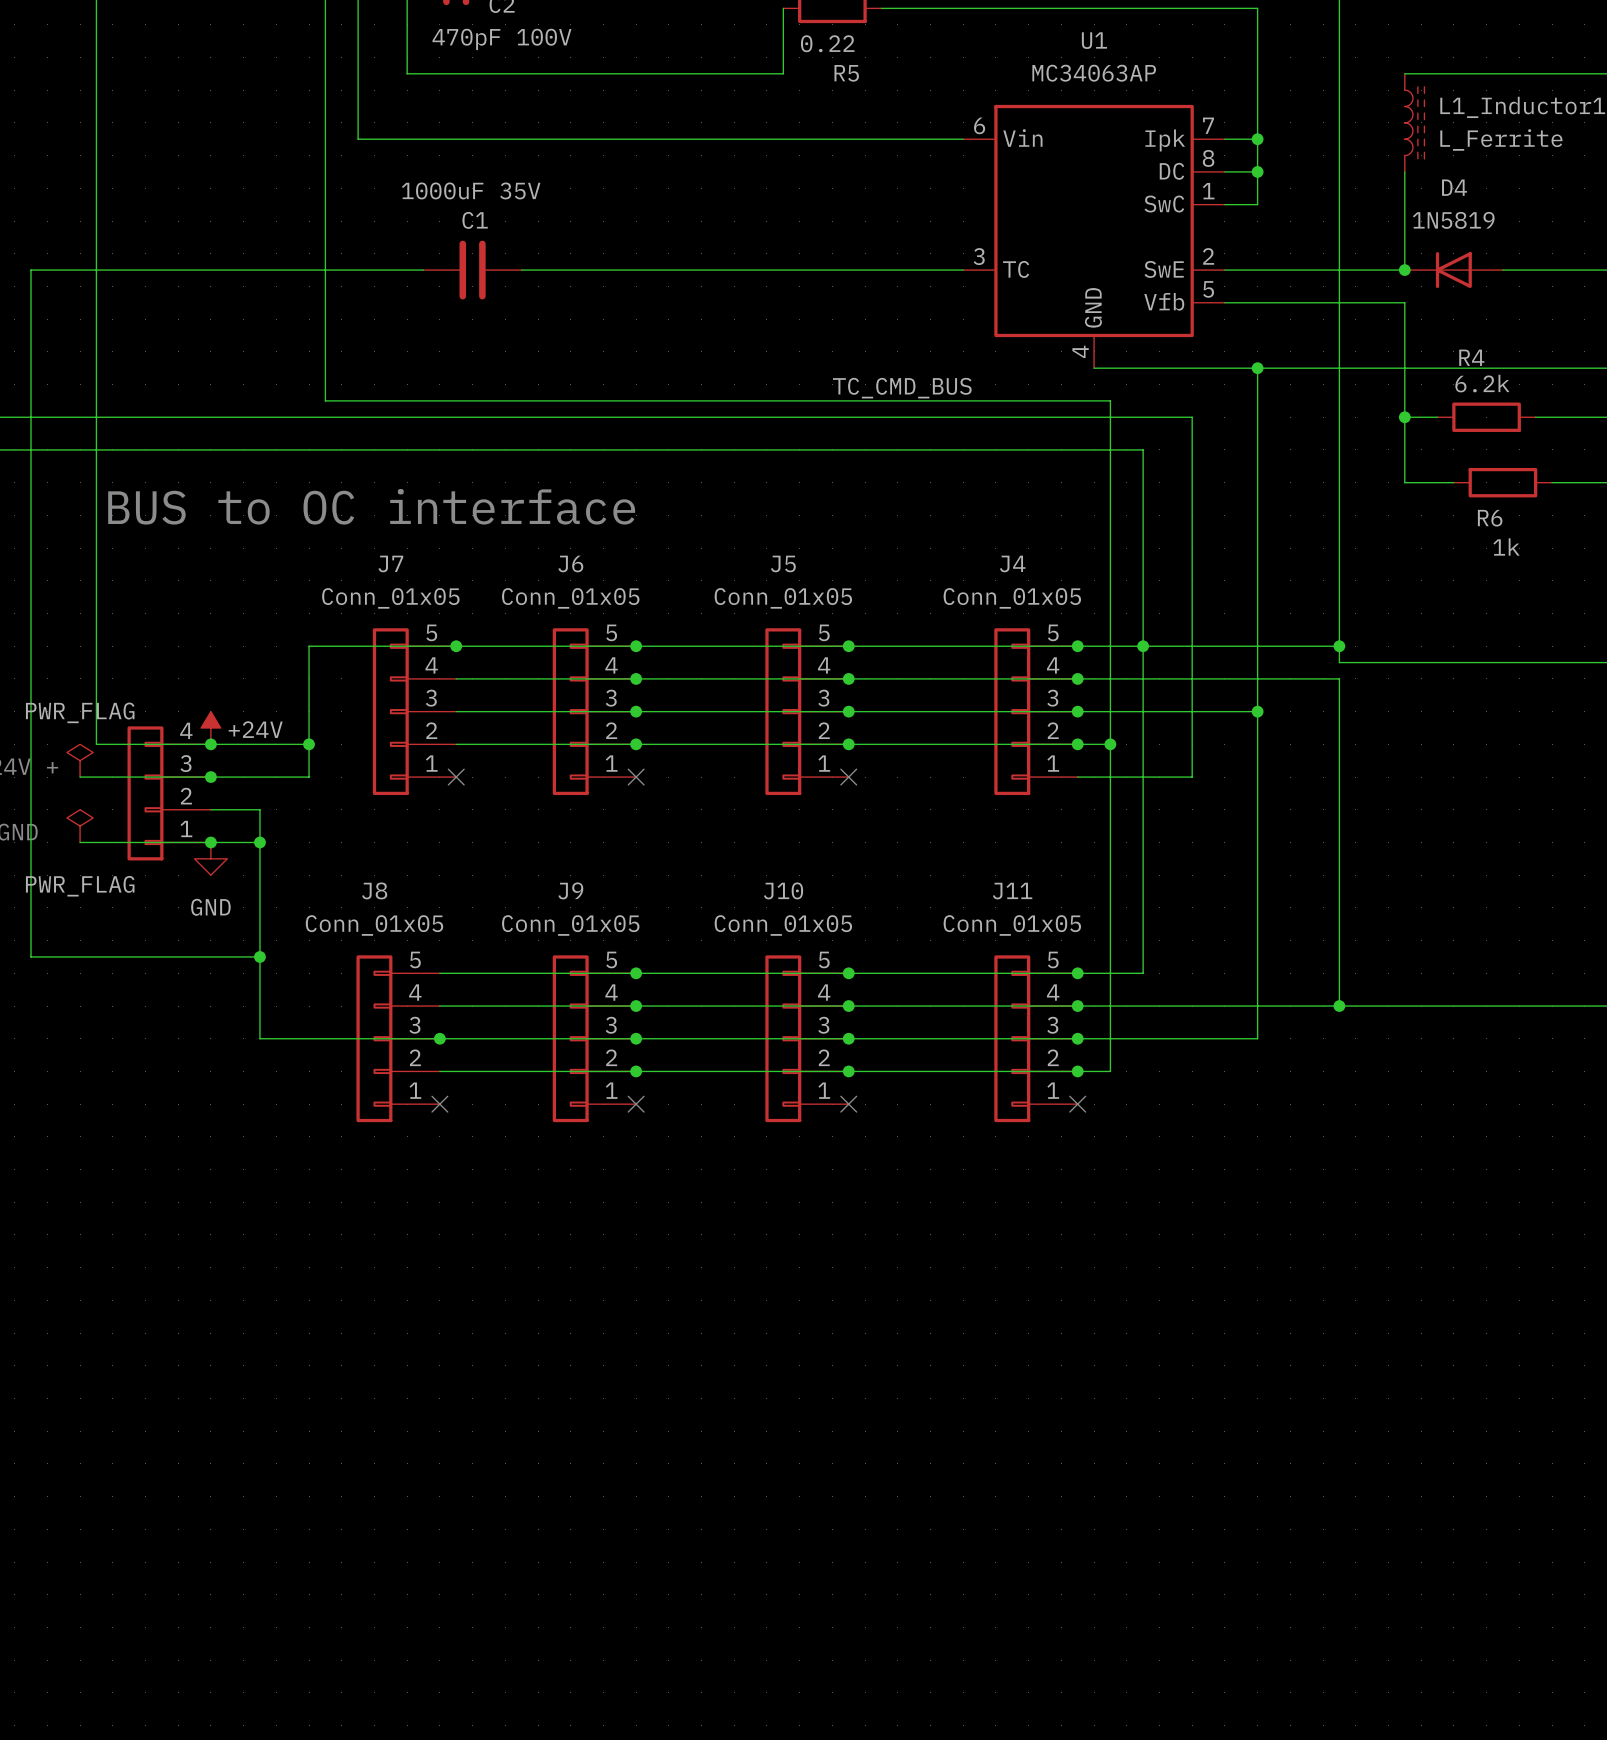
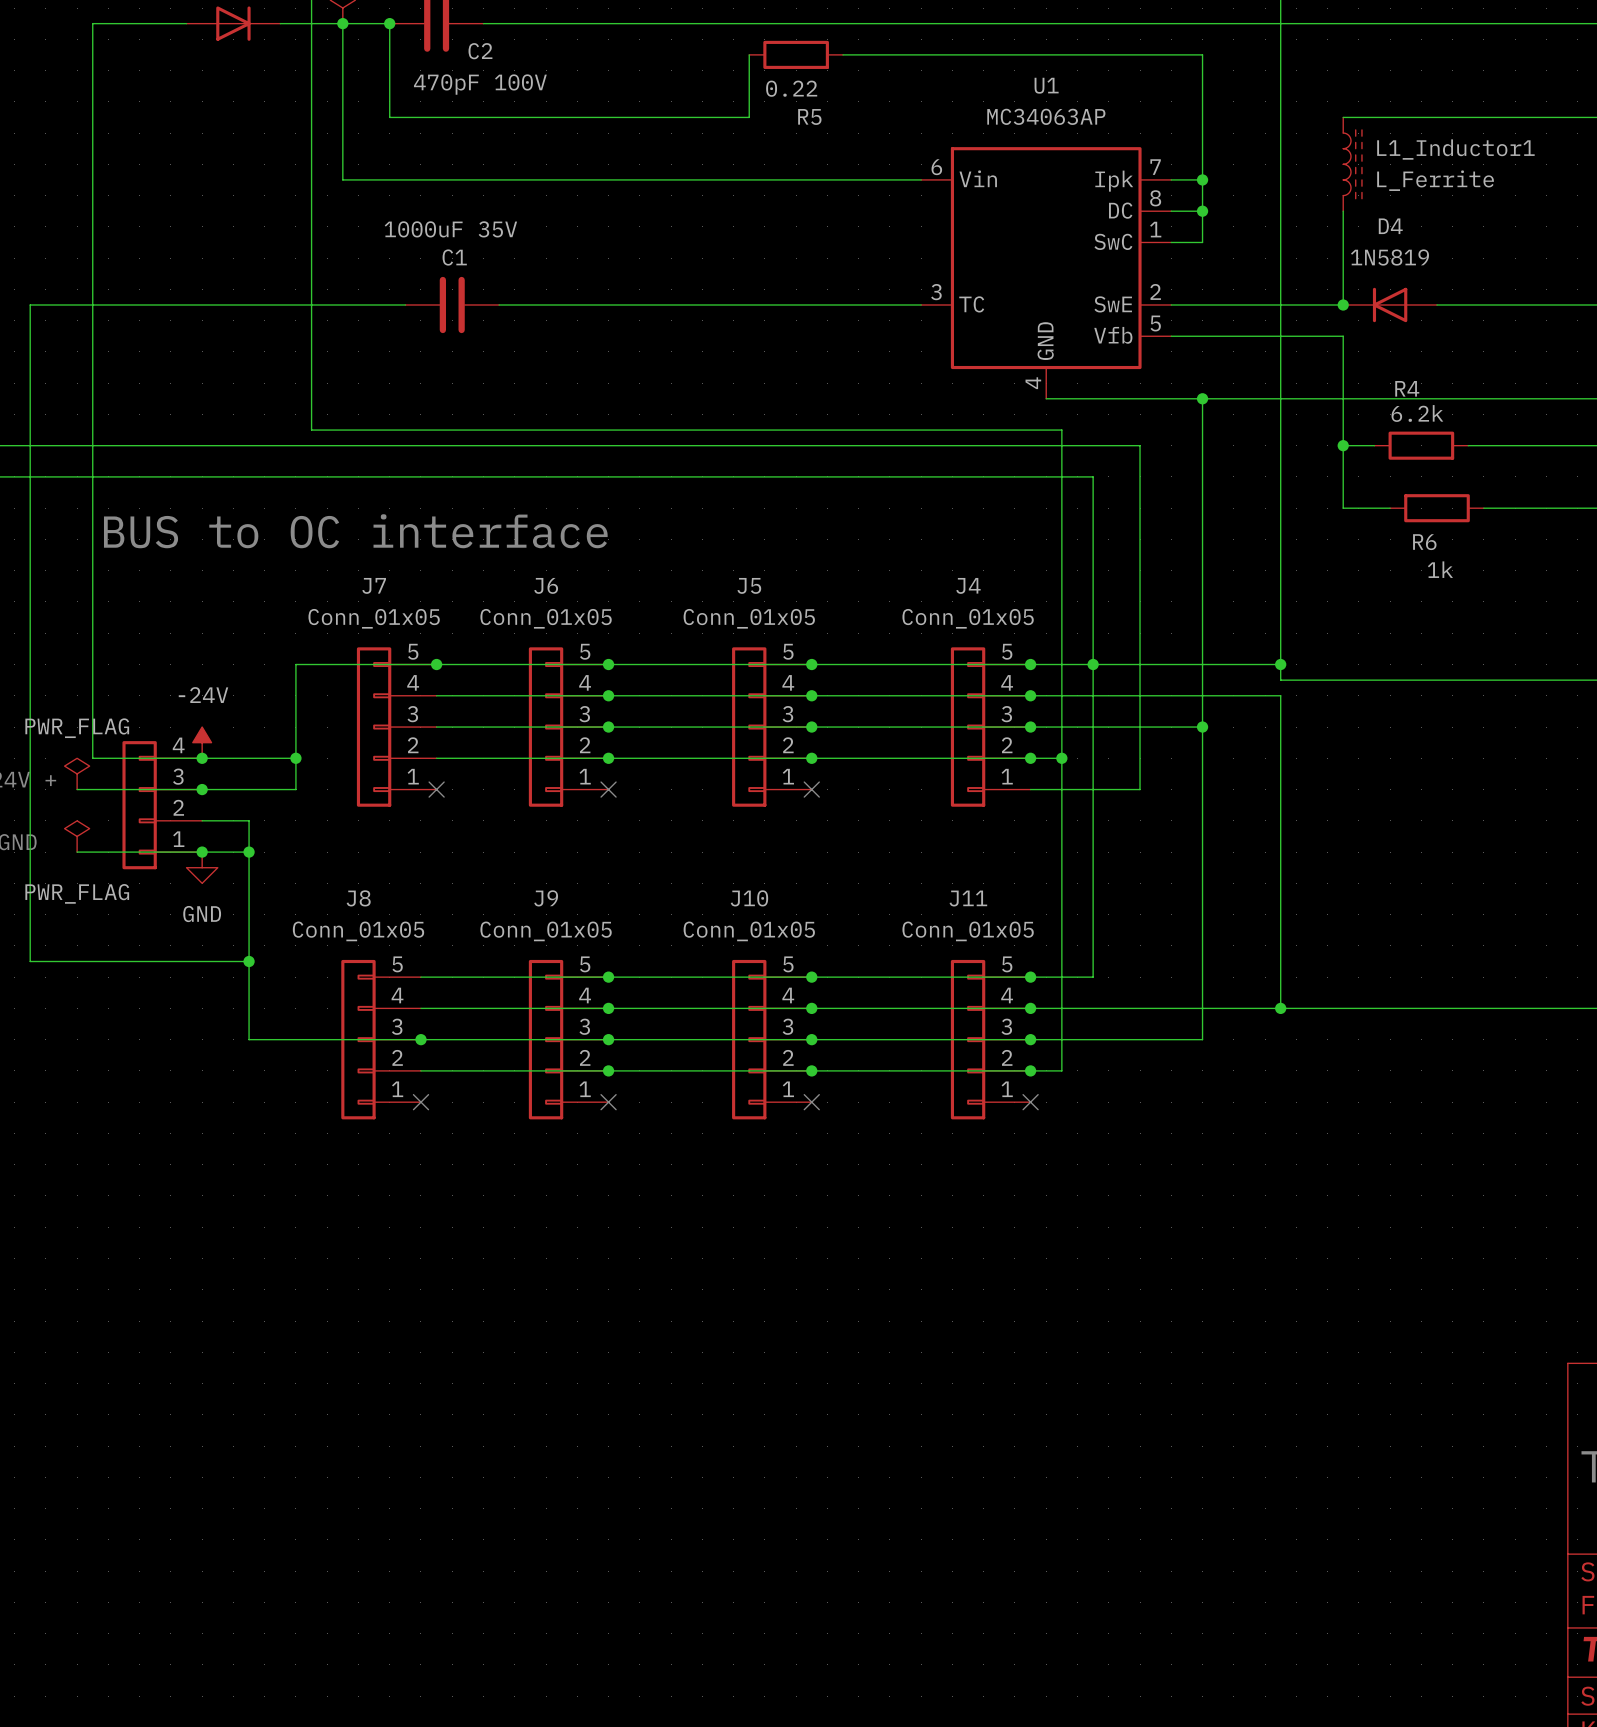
label: TC_CMD_BUS (902, 388) -> none
power symbol text: none -> -24V (203, 695)
label: +24V (255, 729) -> none

